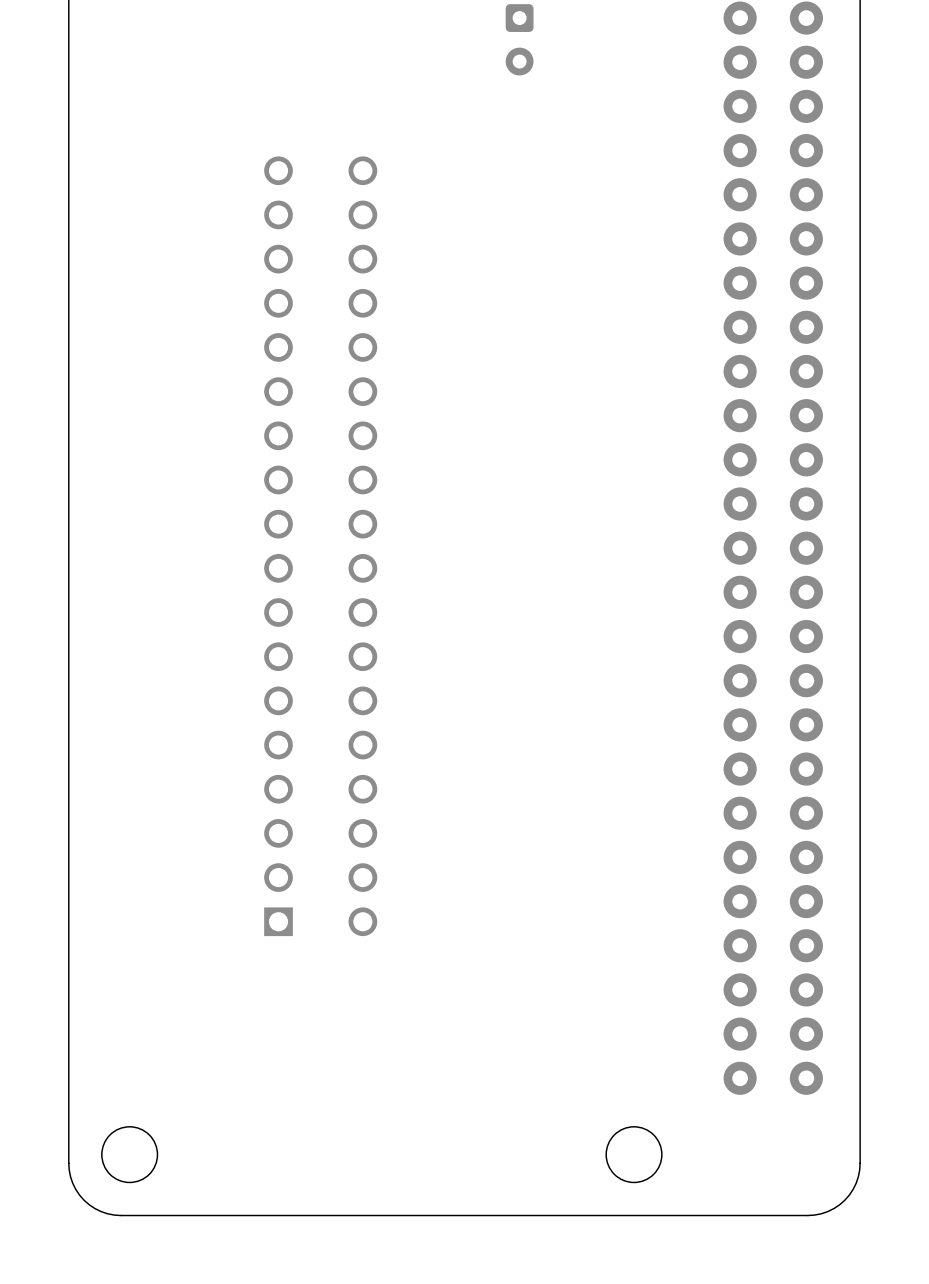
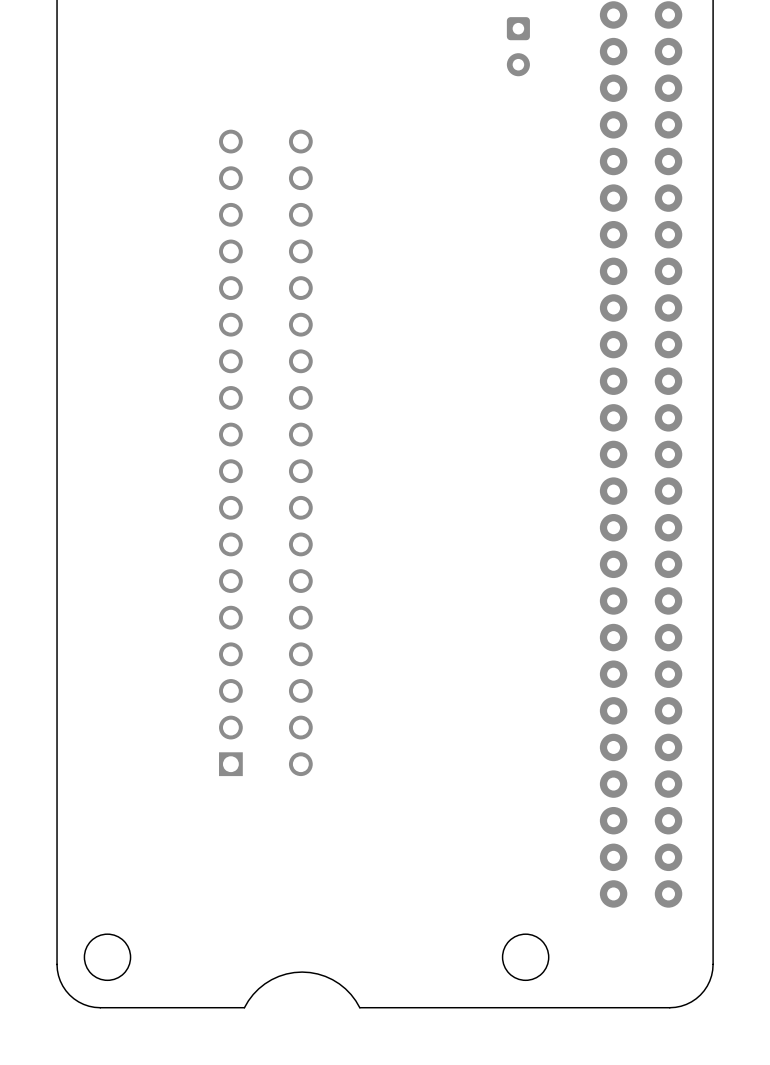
part position: (519, 39) -> (518, 46)
board edge: (433, 1215) (294, 1215) -> (359, 1007) (351, 994) (332, 979) (317, 974) (302, 972) (286, 974) (271, 979) (258, 988) (244, 1007)

